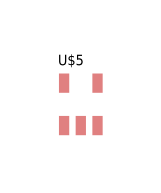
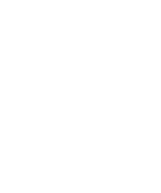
U$5: (80, 104) -> none

